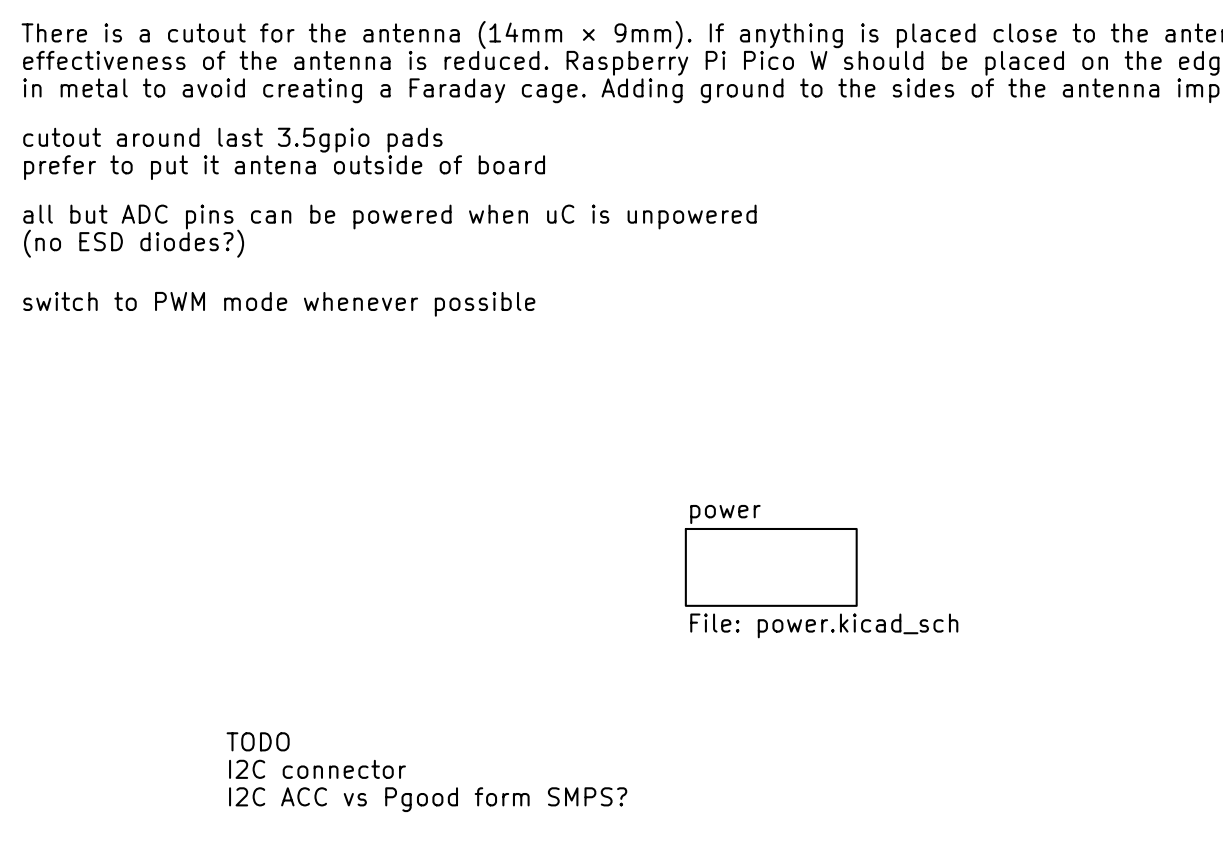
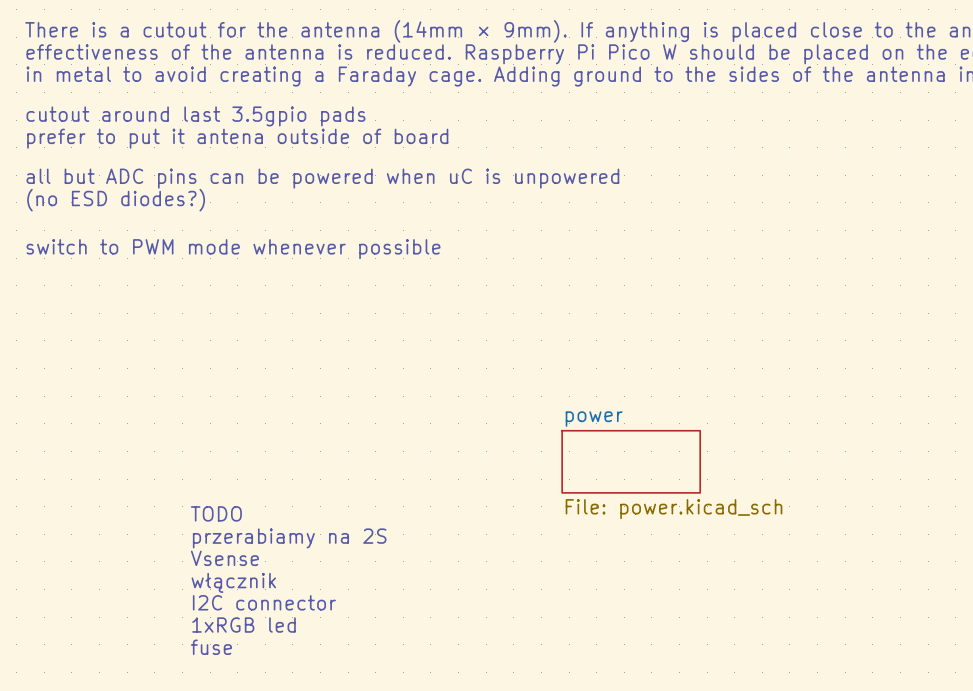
text: none -> TODO (216, 513)
text: none -> przerabiamy na 2S (289, 538)
text: none -> Vsense (224, 558)
text: none -> włącznik (233, 582)
text: TODO (258, 741) -> I2C connector (264, 602)
text: I2C connector (317, 769) -> 1xRGB led (243, 625)
text: I2C ACC vs Pgood form SMPS? (428, 799) -> fuse (211, 647)

